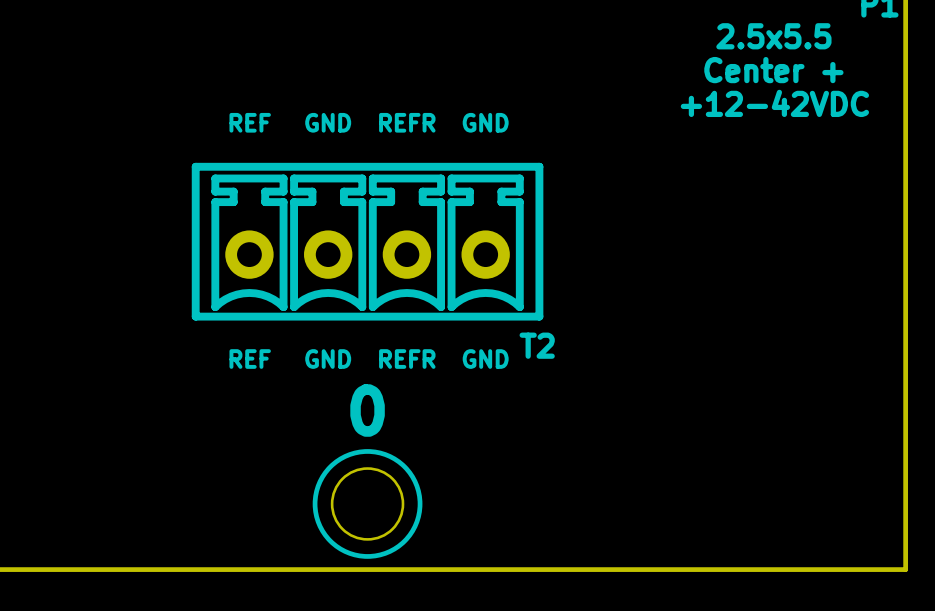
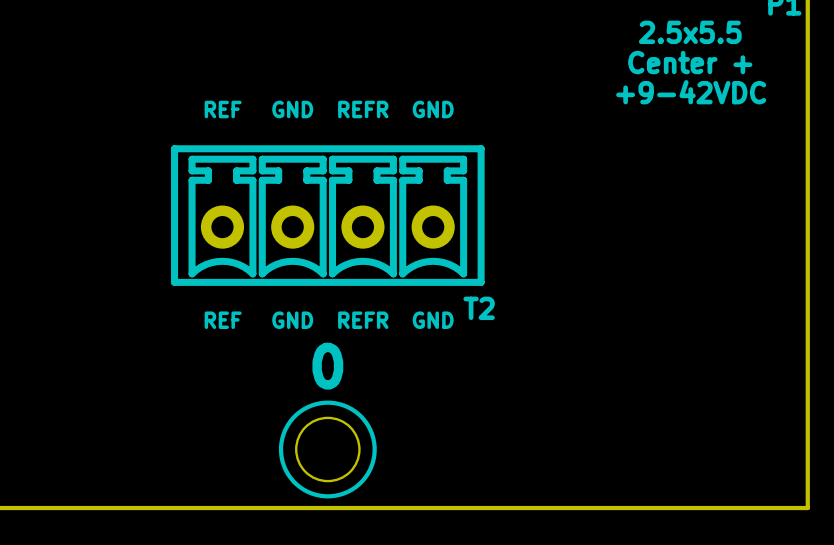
text: +12-42VDC (774, 103) -> +9-42VDC (691, 92)

